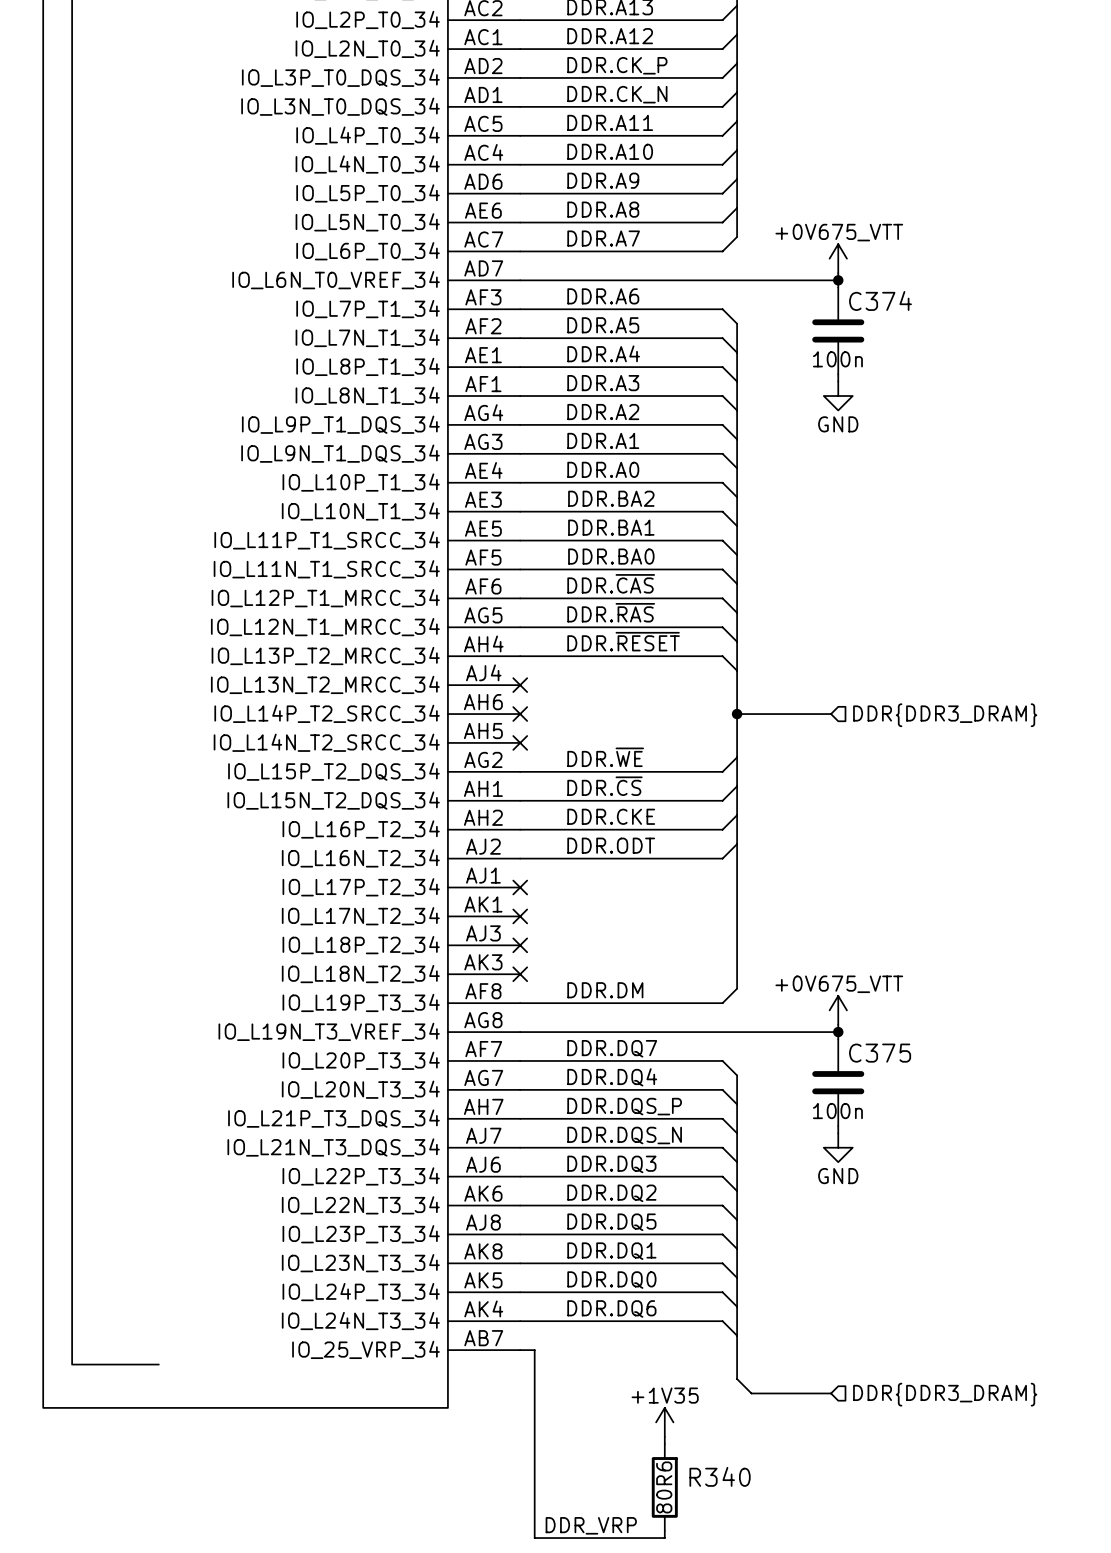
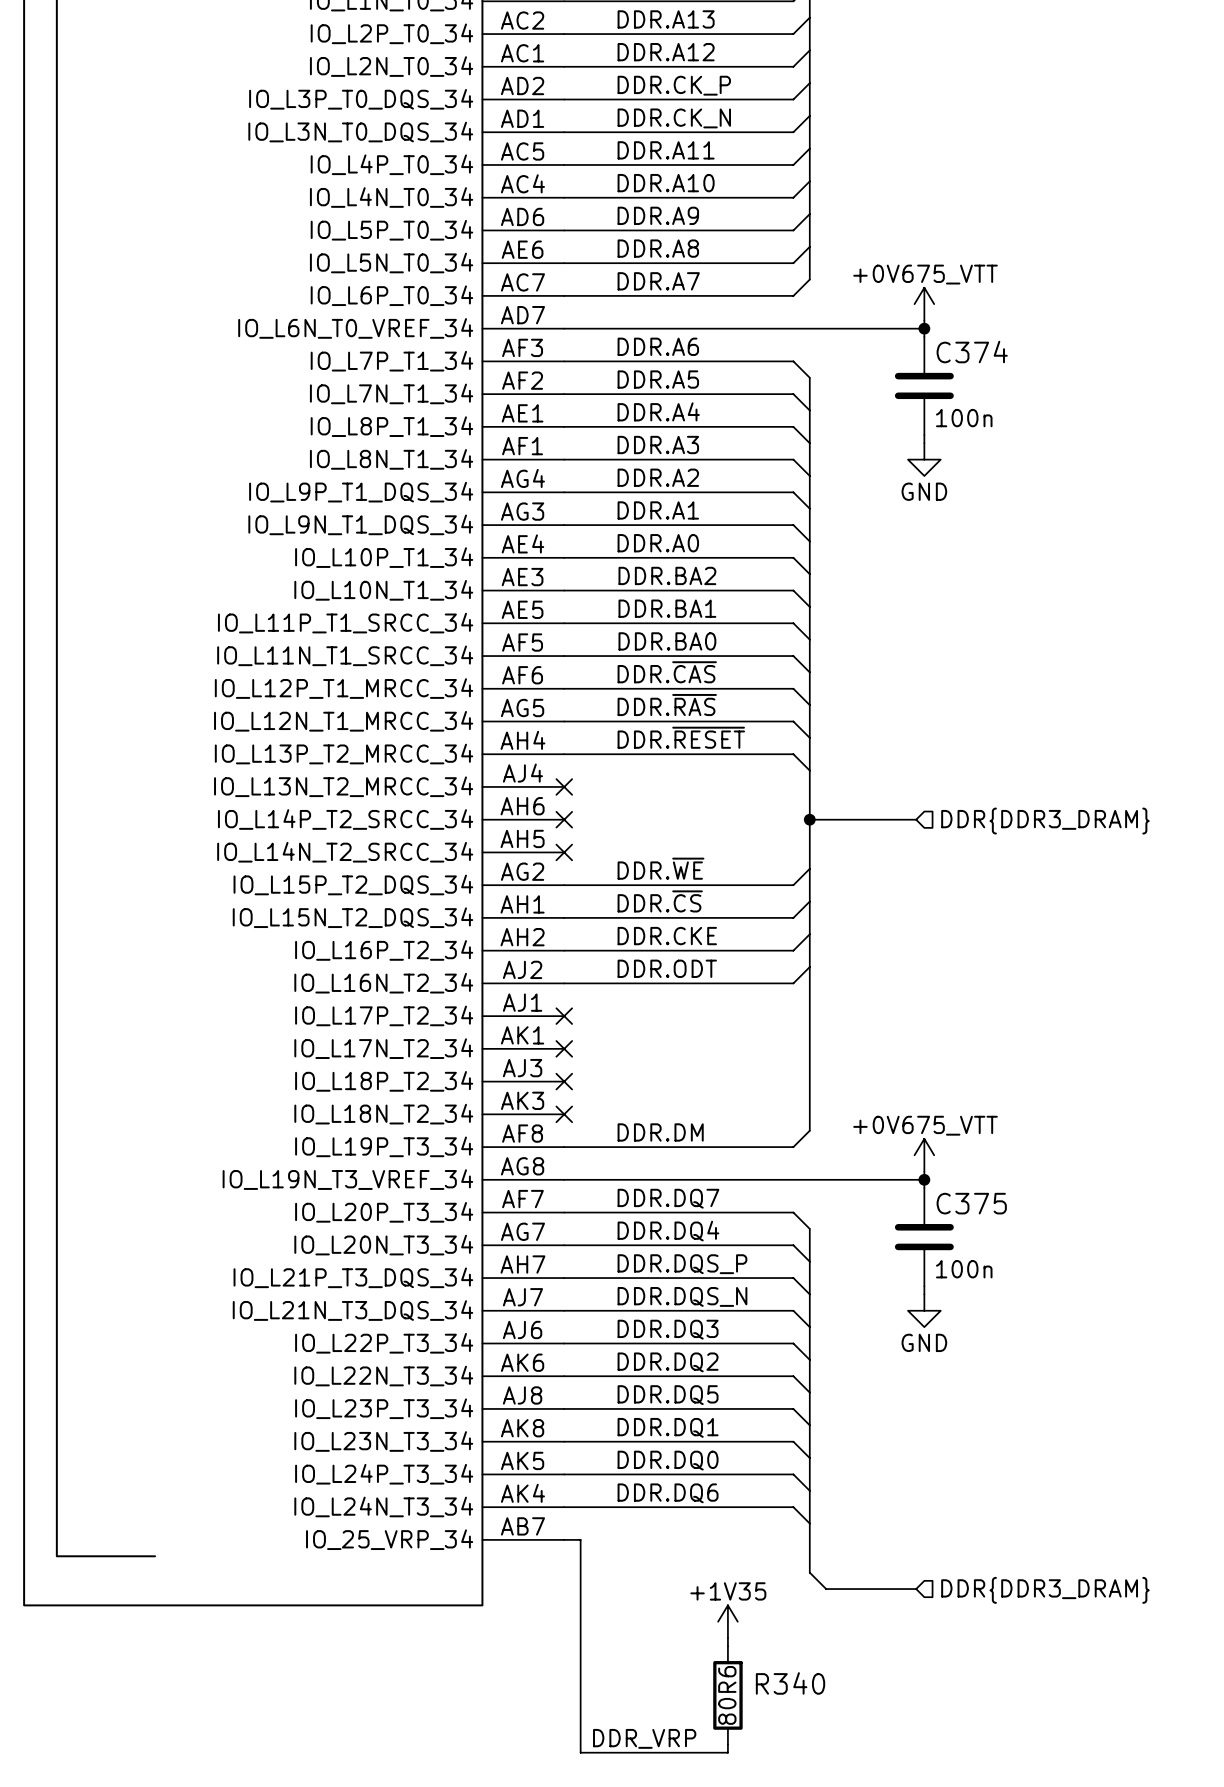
C374 text position: 100n (837, 359) -> 100n (964, 418)
C375 text position: 100n (837, 1111) -> 100n (964, 1269)

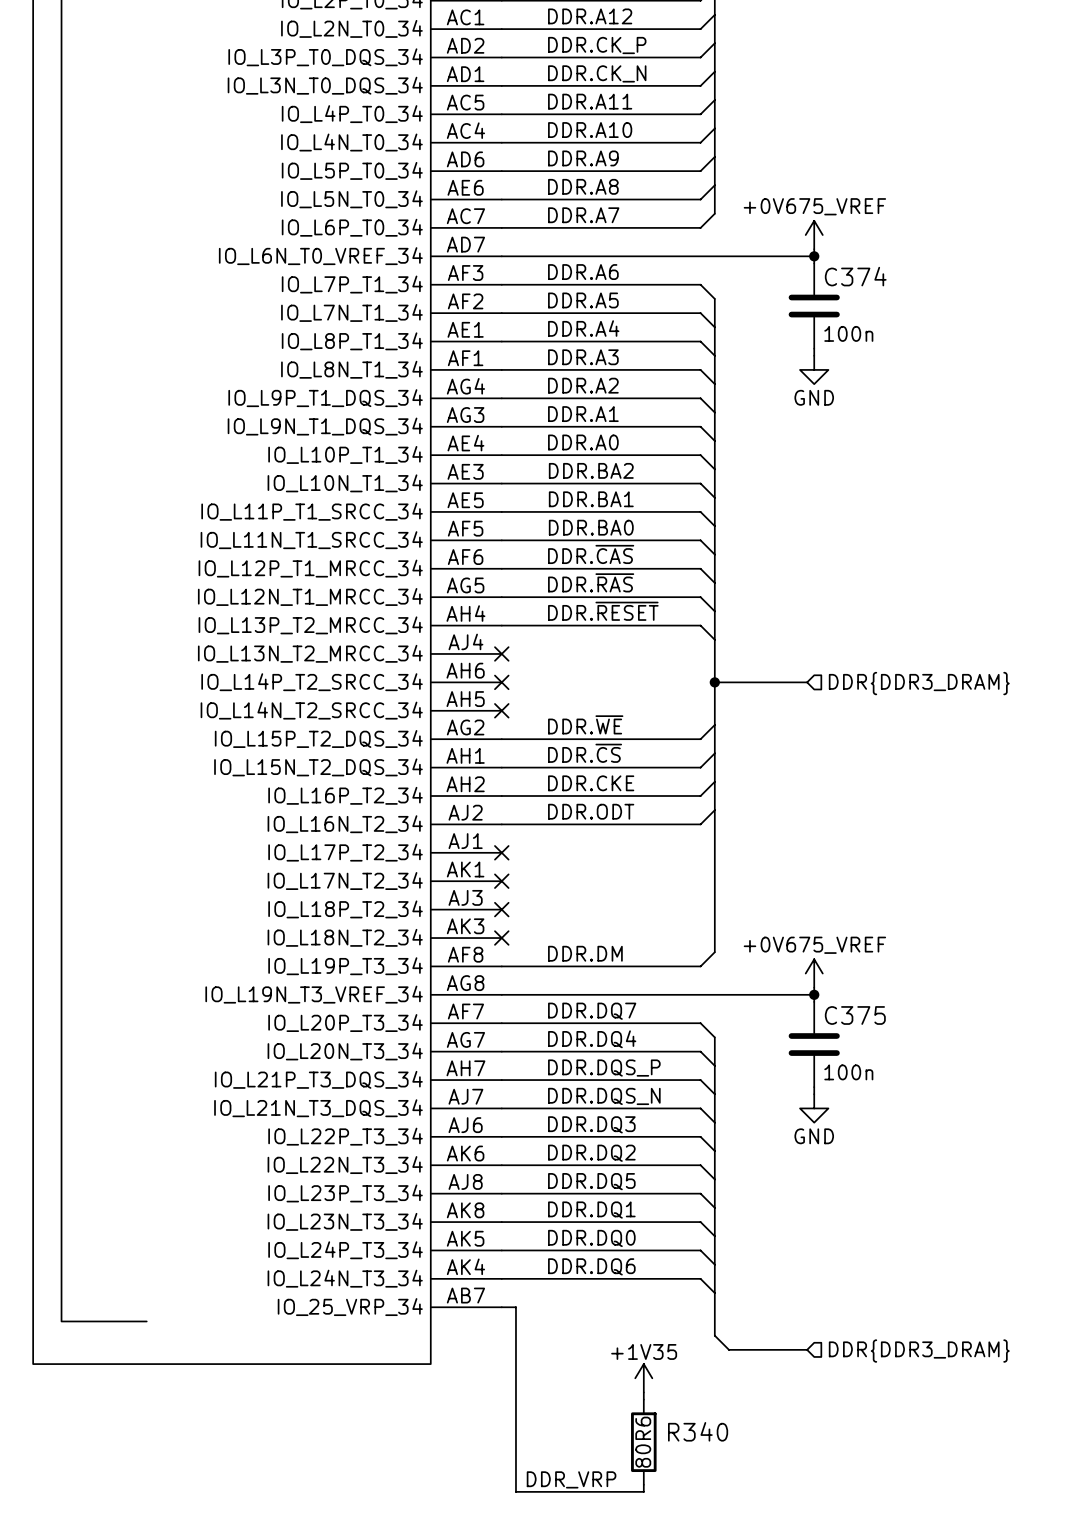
power symbol: +0V675_VTT (924, 304) -> +0V675_VREF (814, 235)
power symbol: +0V675_VTT (924, 1155) -> +0V675_VREF (814, 973)

